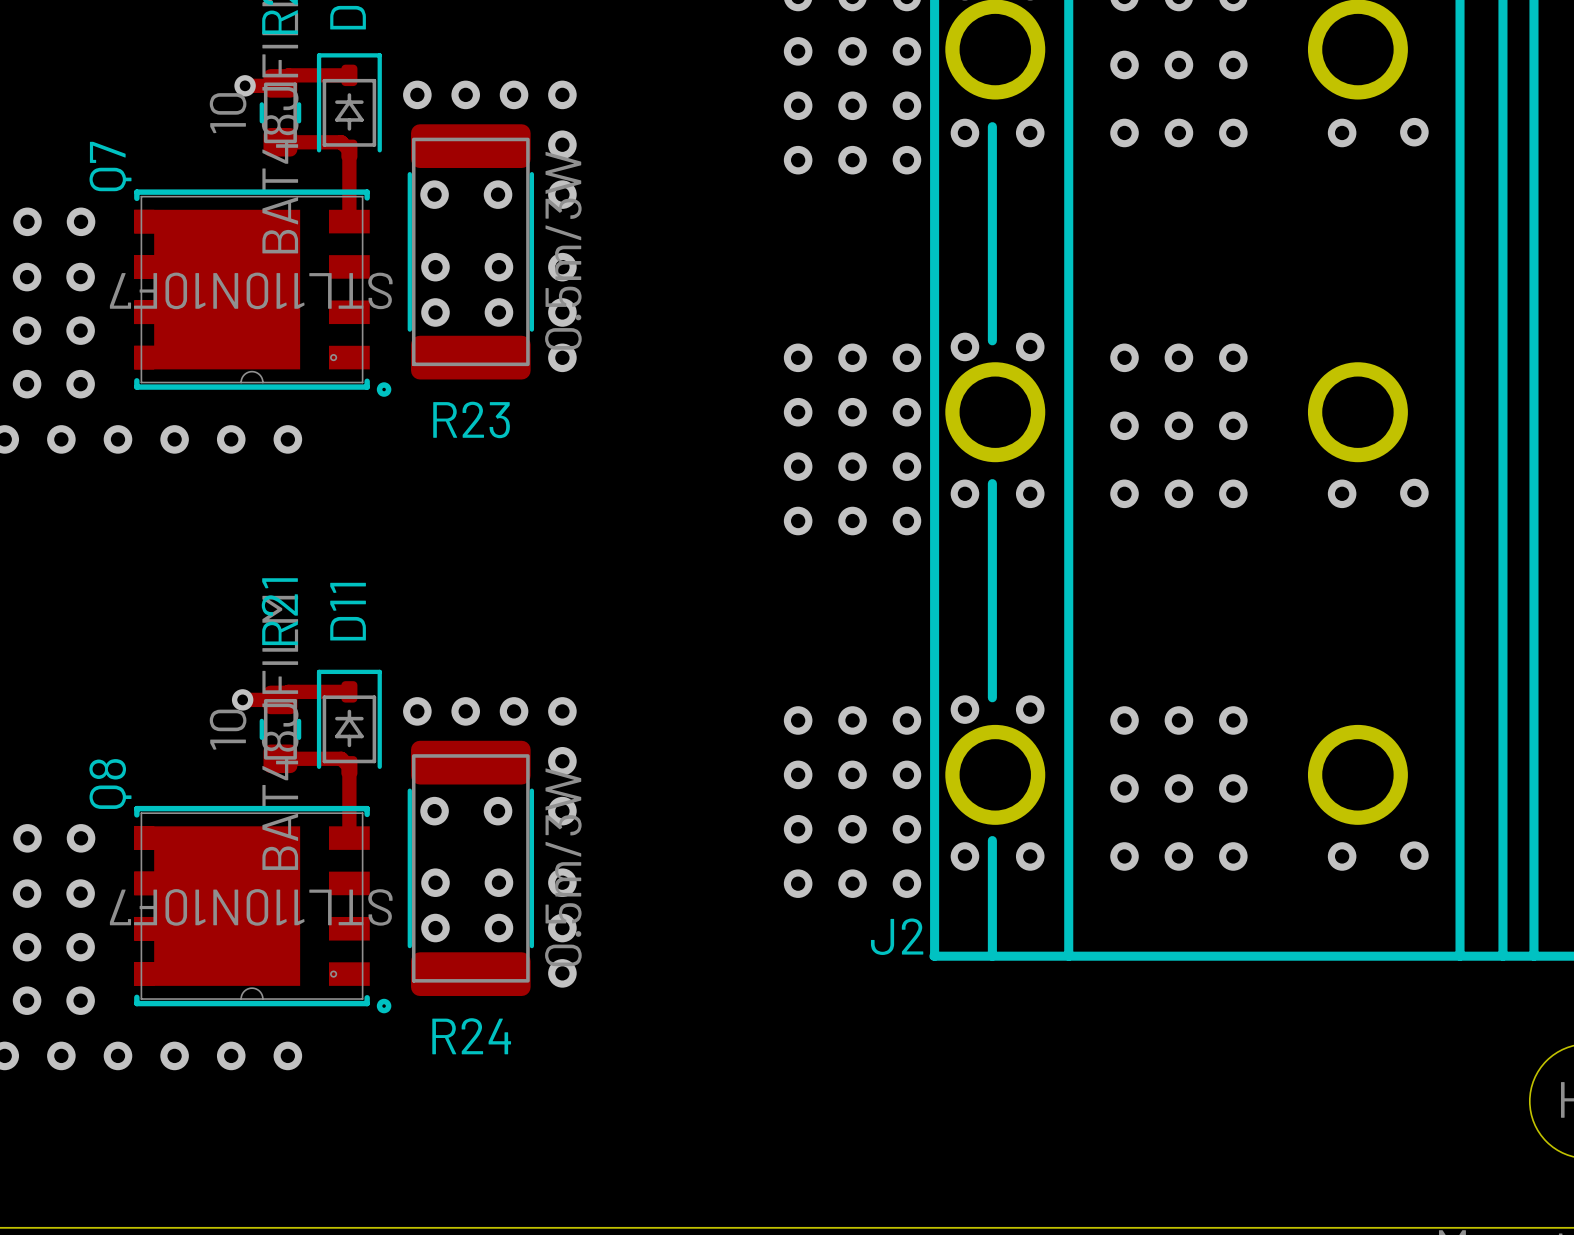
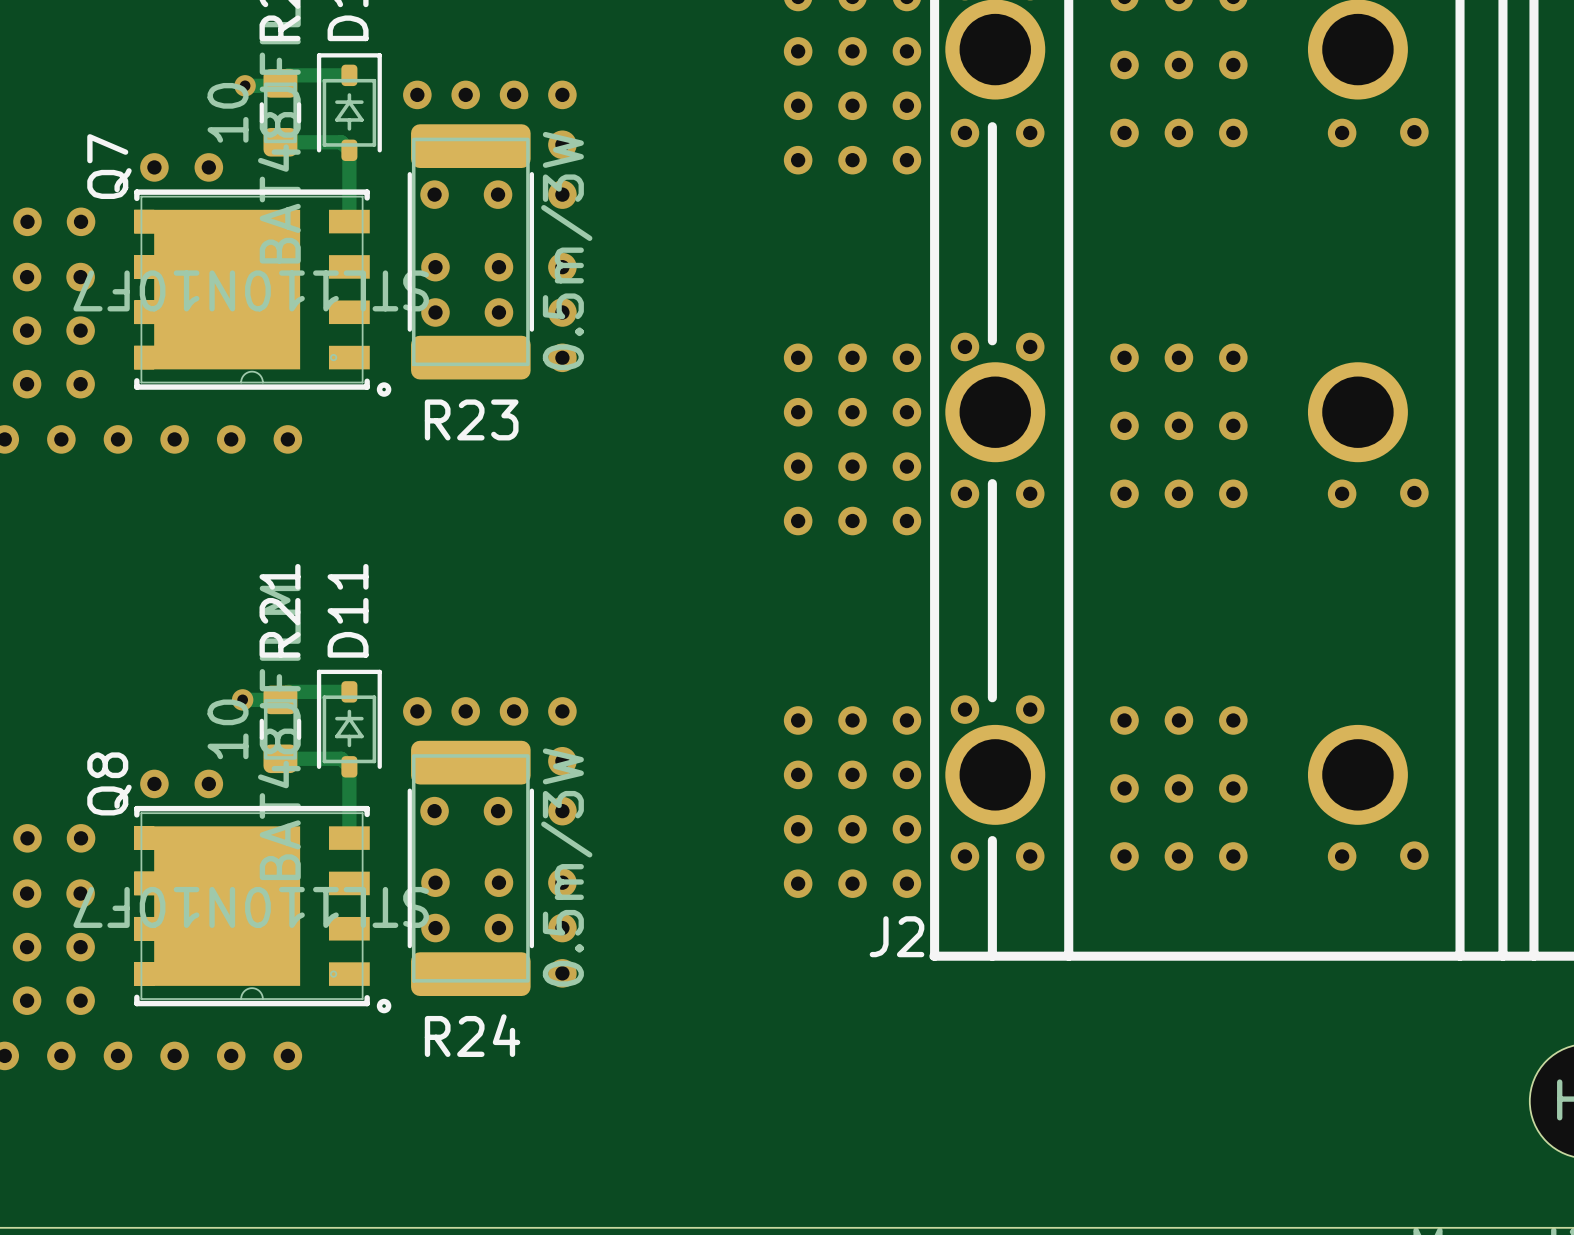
via: none -> (154, 167)
via: none -> (208, 167)
via: none -> (154, 783)
via: none -> (208, 783)

